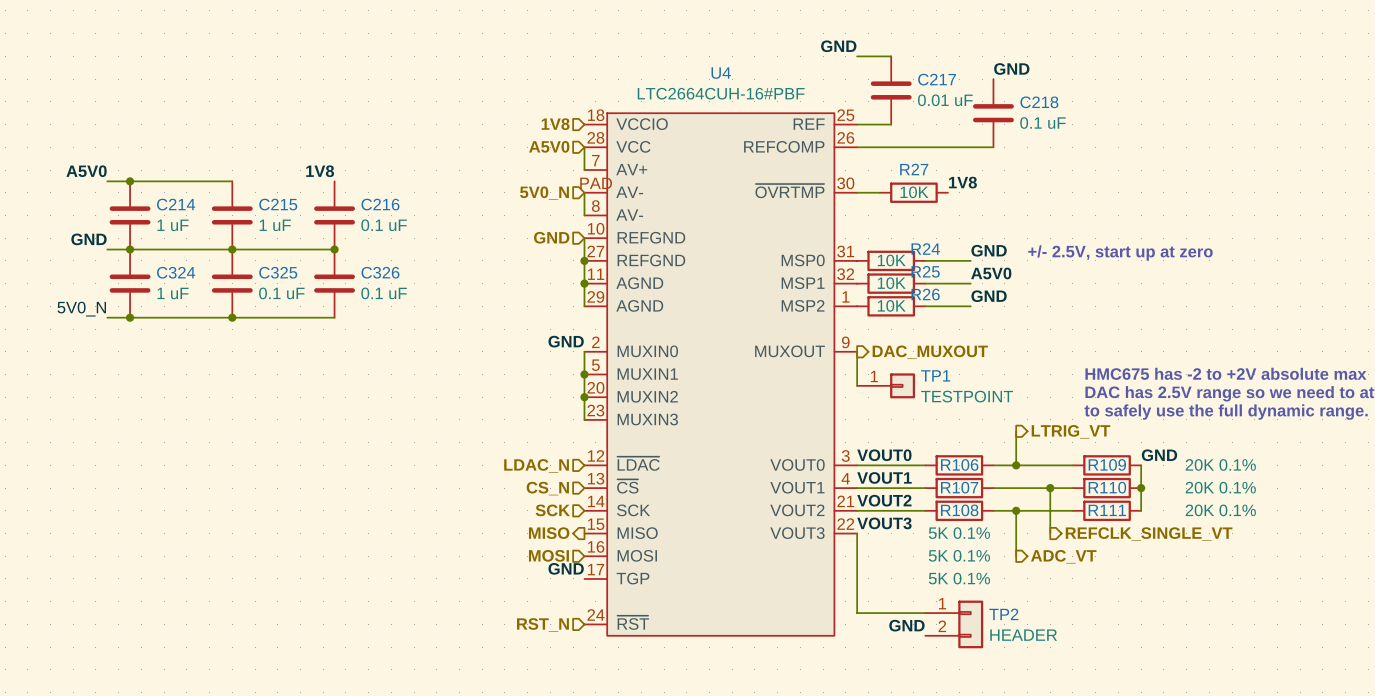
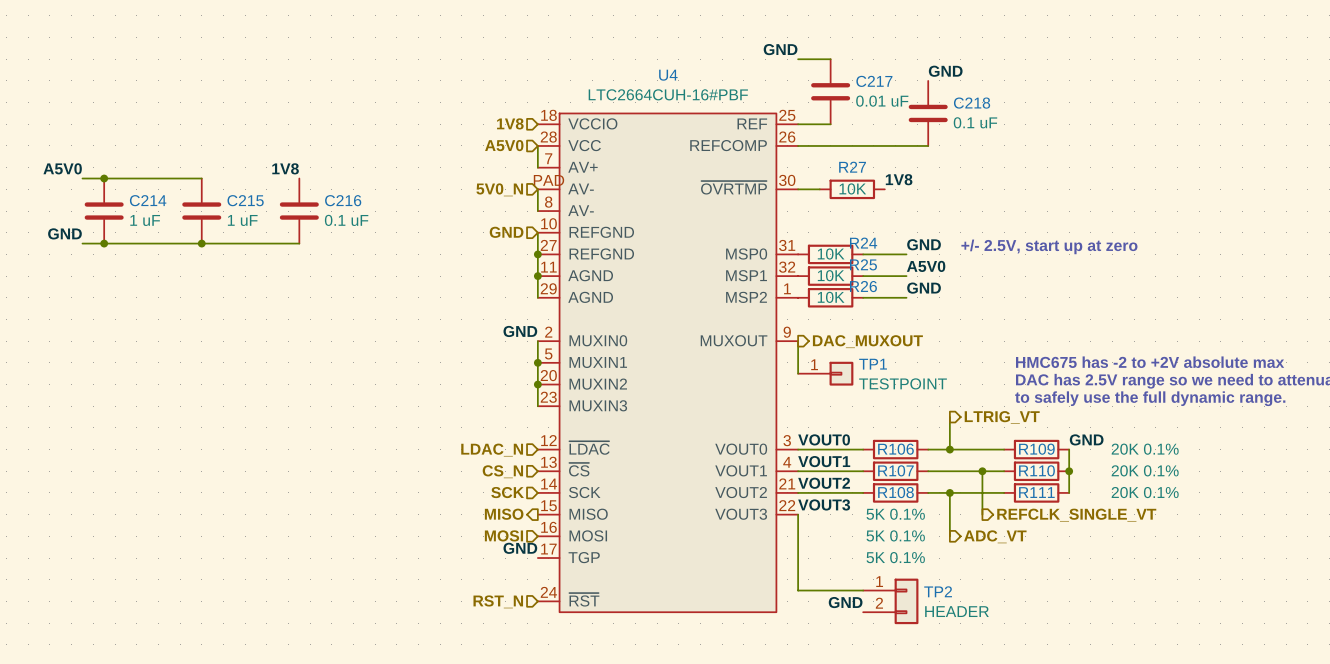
junction: (334, 249) -> none
C324: 1 uF (130, 283) -> none
C325: 0.1 uF (232, 283) -> none
C326: 0.1 uF (334, 283) -> none
label: 5V0_N (81, 309) -> none
wire: (107, 317) (334, 317) -> none
junction: (130, 317) -> none
junction: (232, 317) -> none

